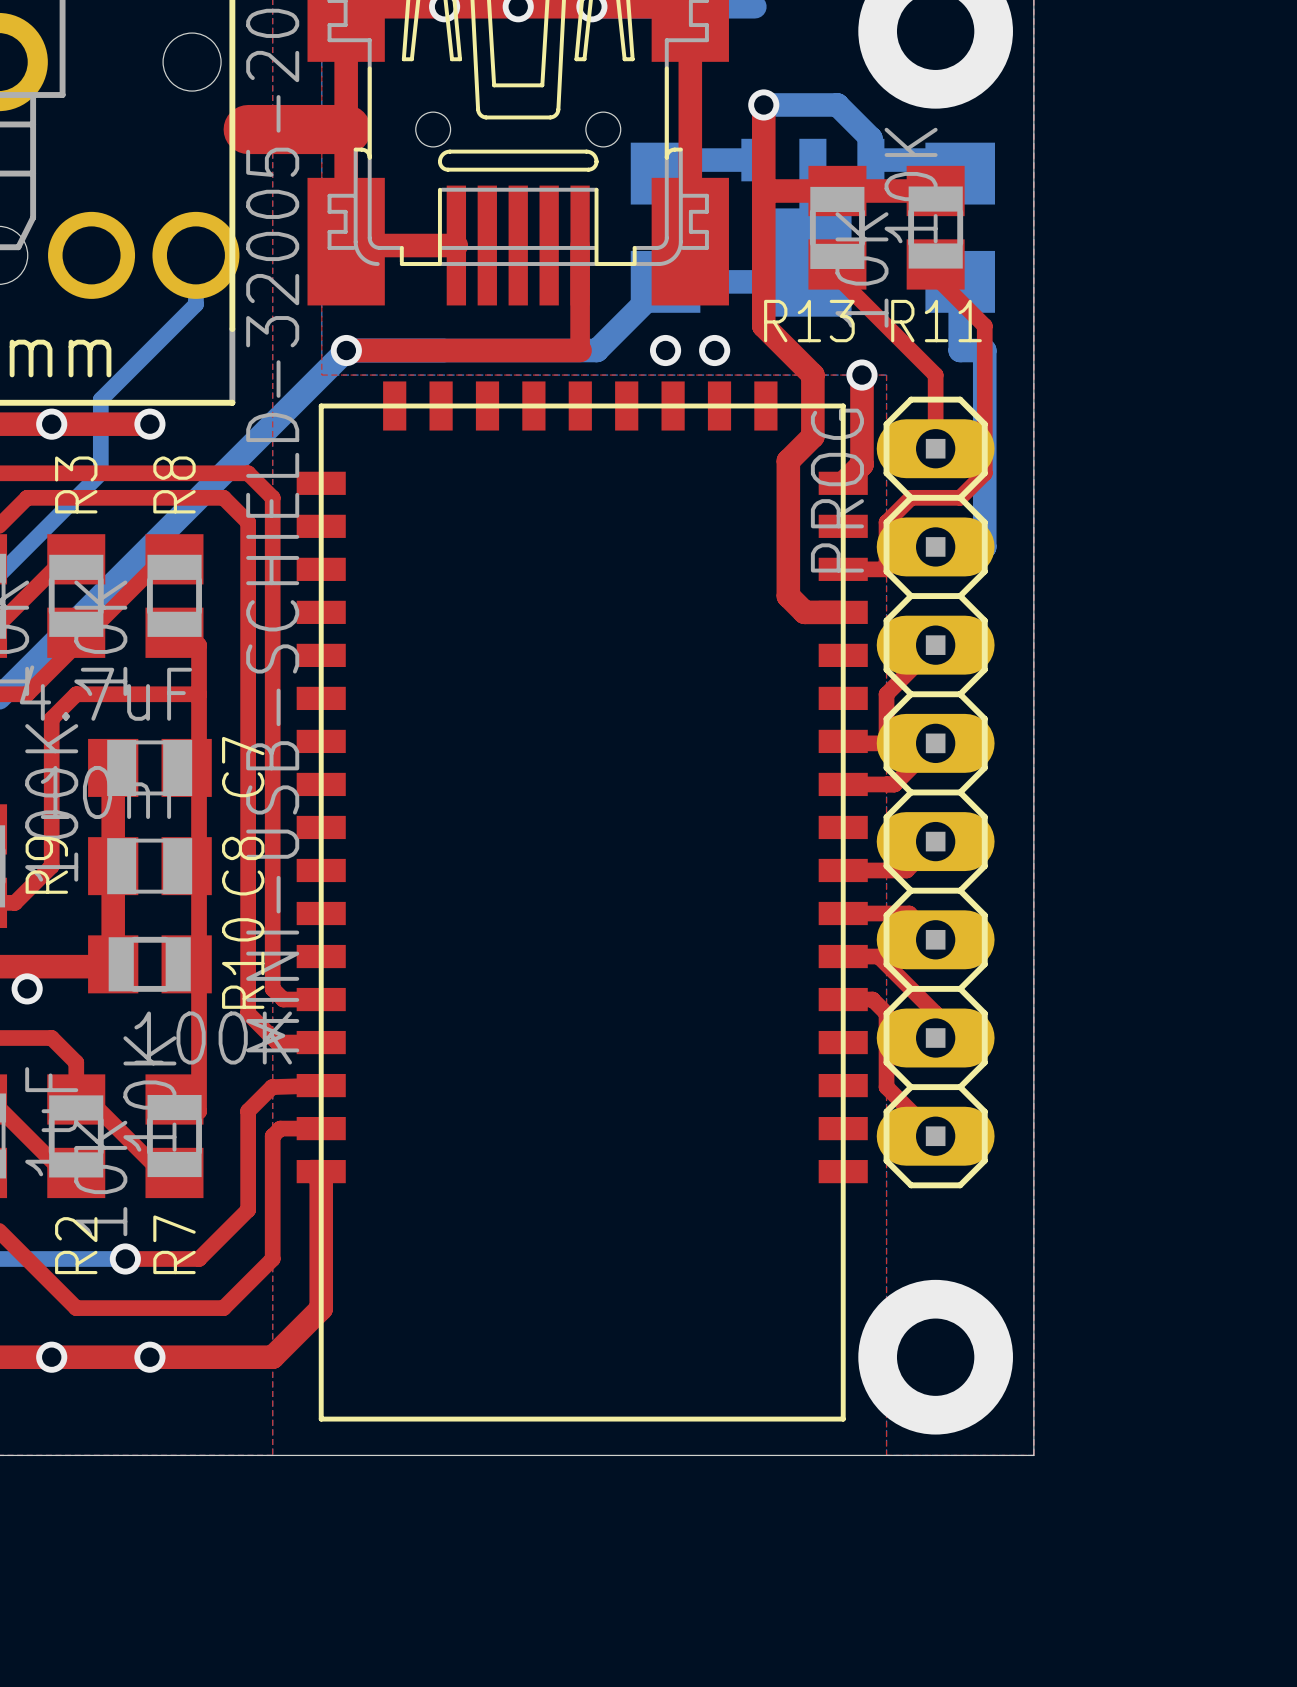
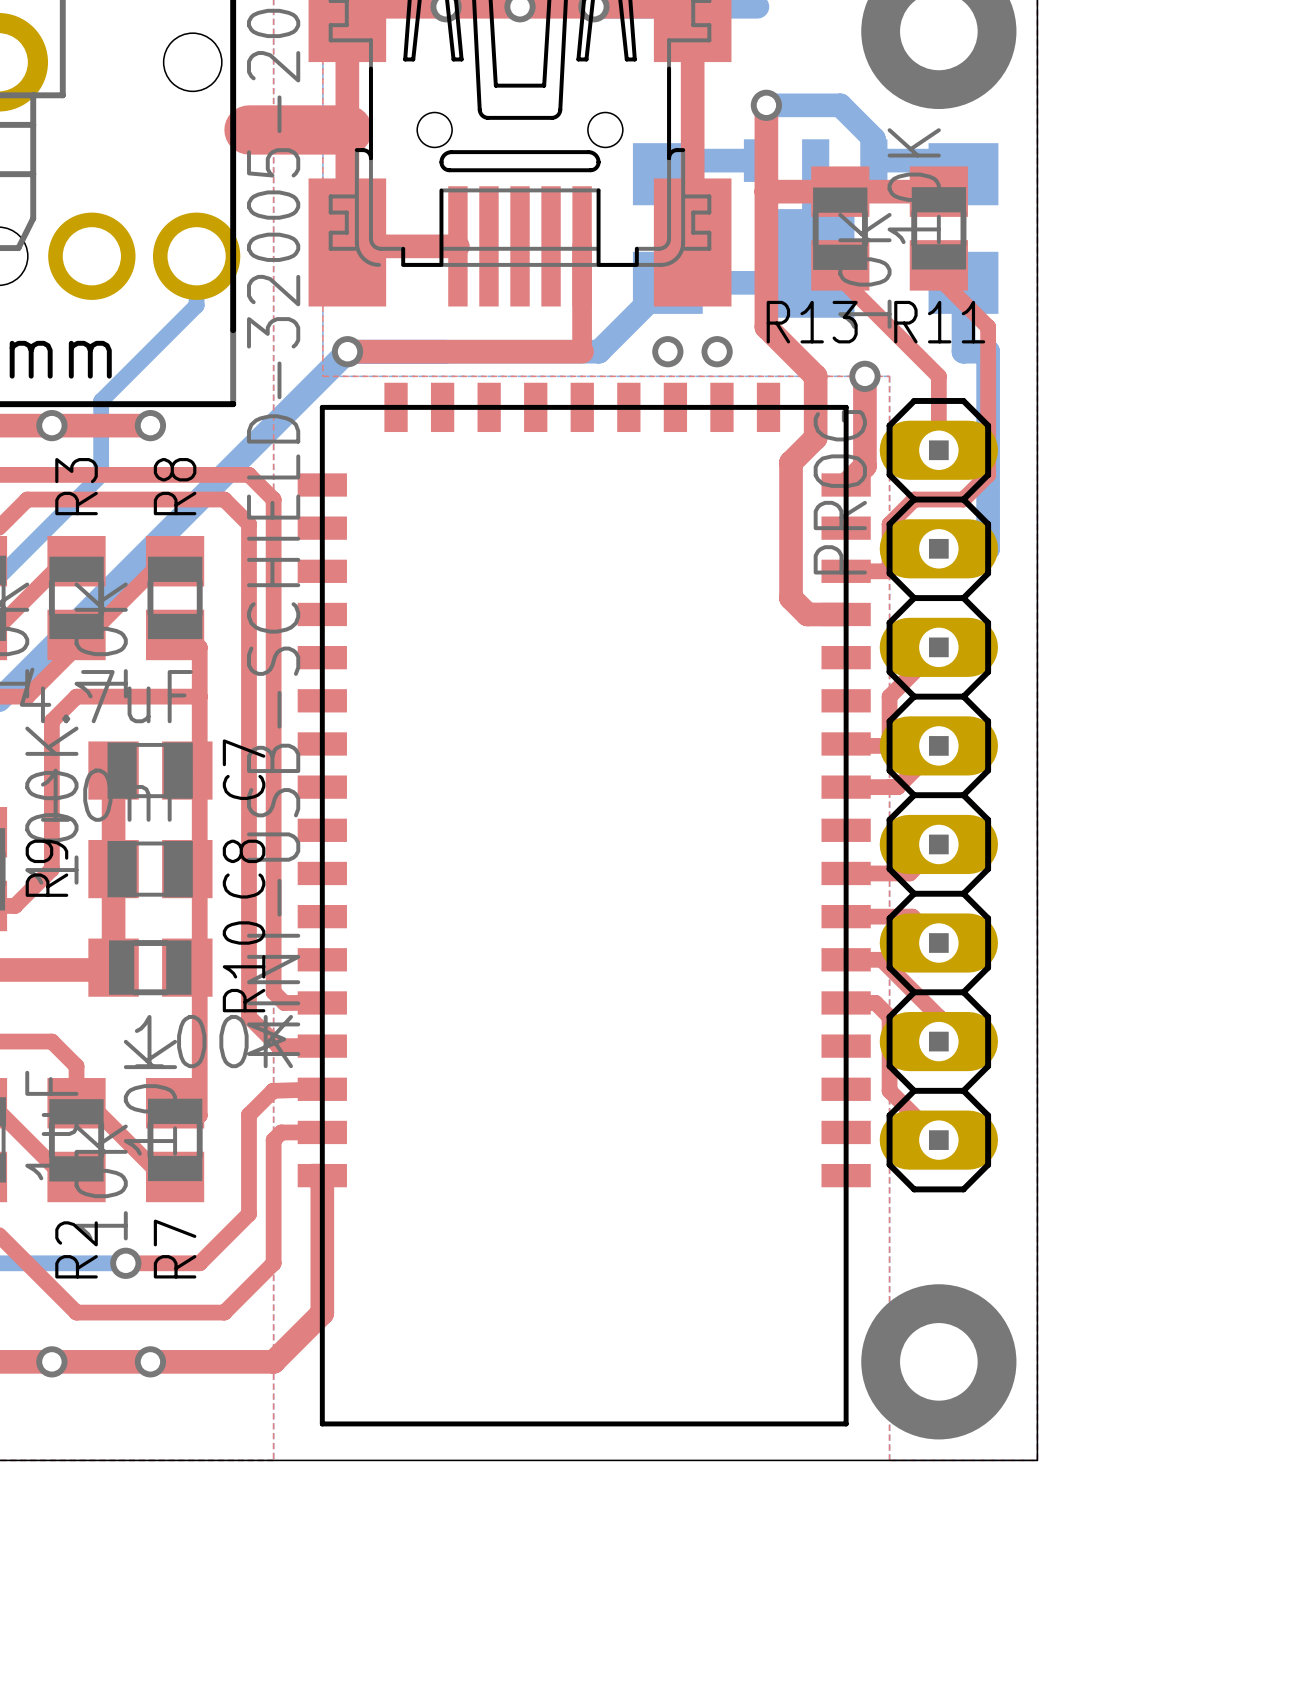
via: (27, 988) -> none

